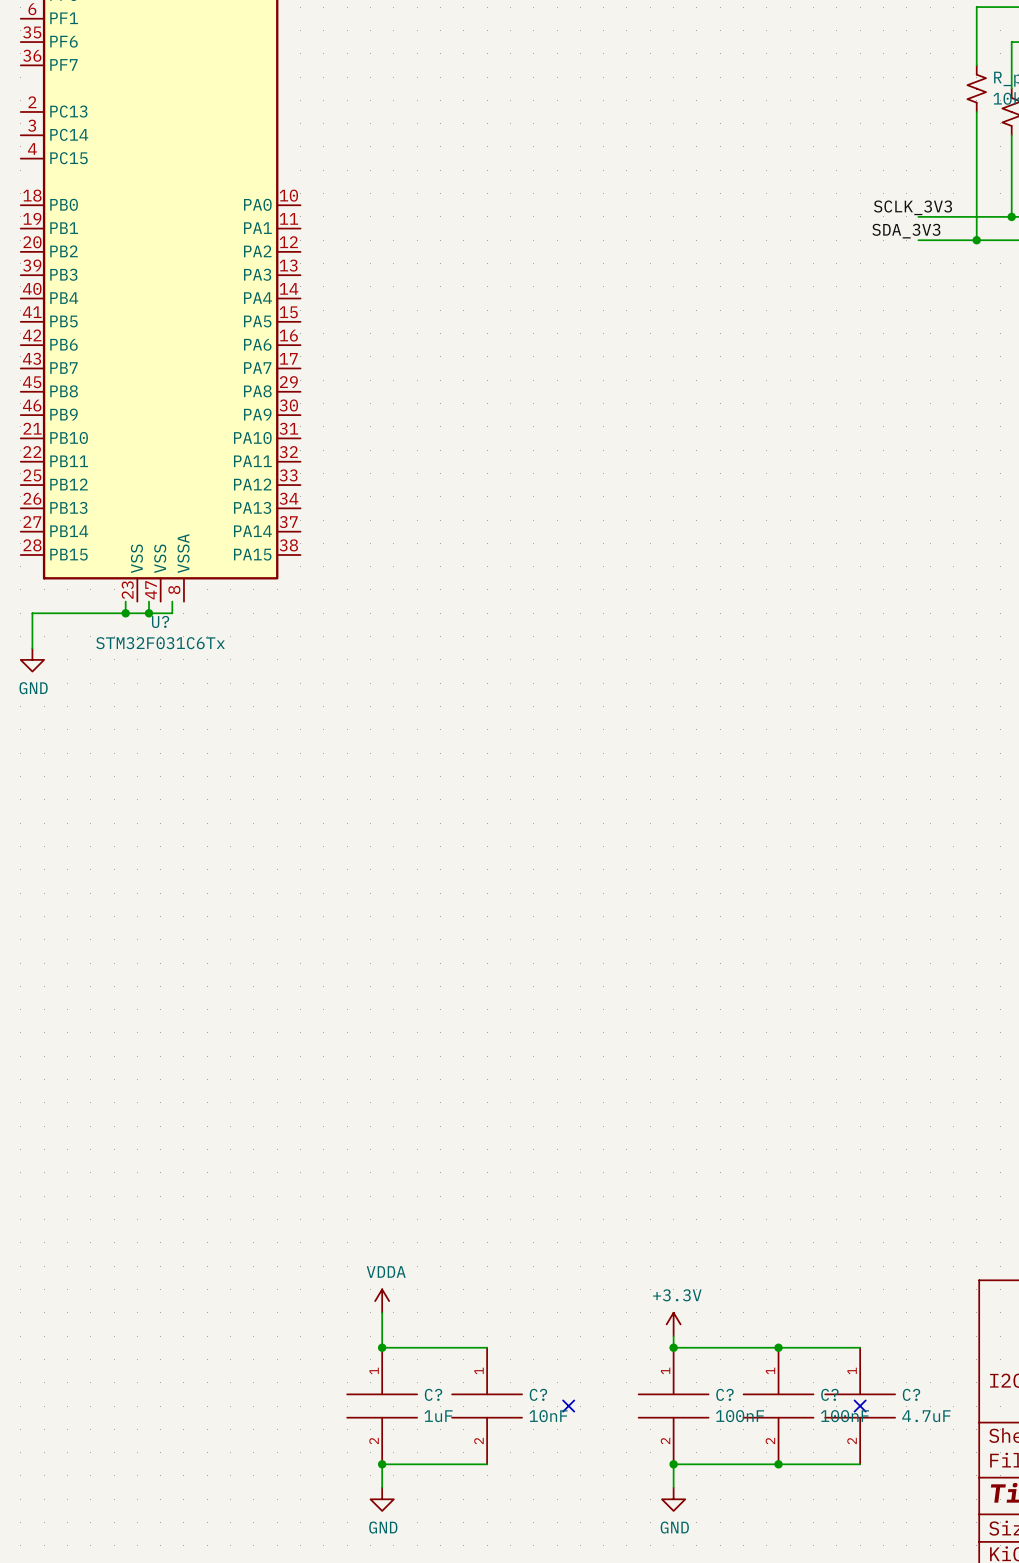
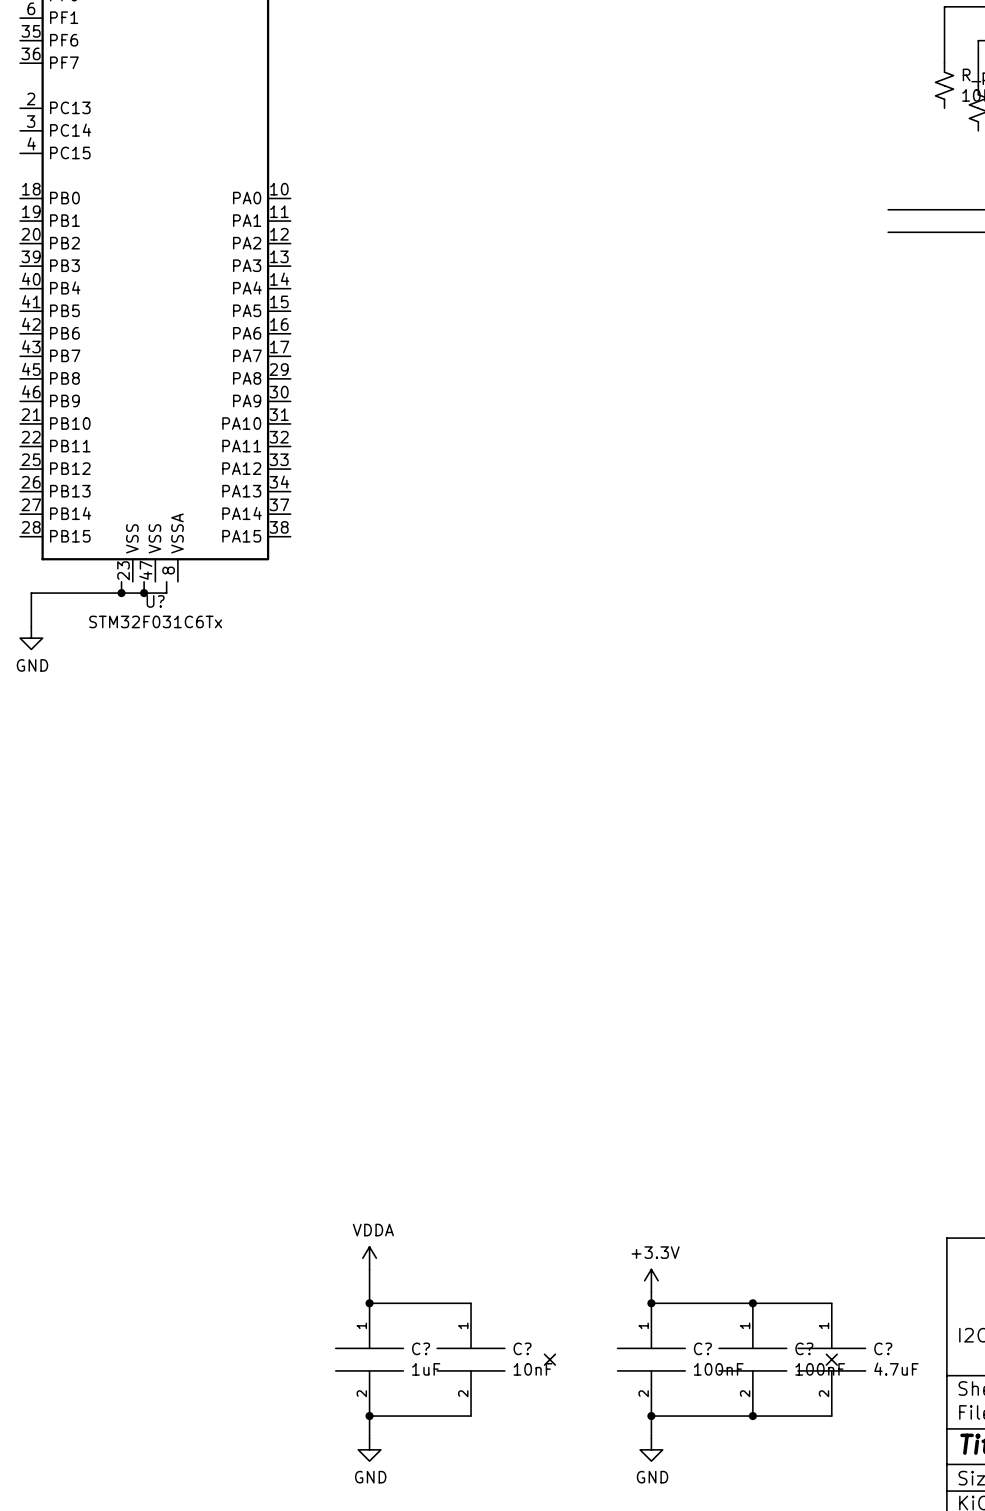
wire: (976, 111) (976, 240) -> none
wire: (1011, 135) (1011, 216) -> none
label: SCLK_3V3 (913, 207) -> none
junction: (1011, 216) -> none
label: SDA_3V3 (906, 231) -> none
junction: (976, 240) -> none

